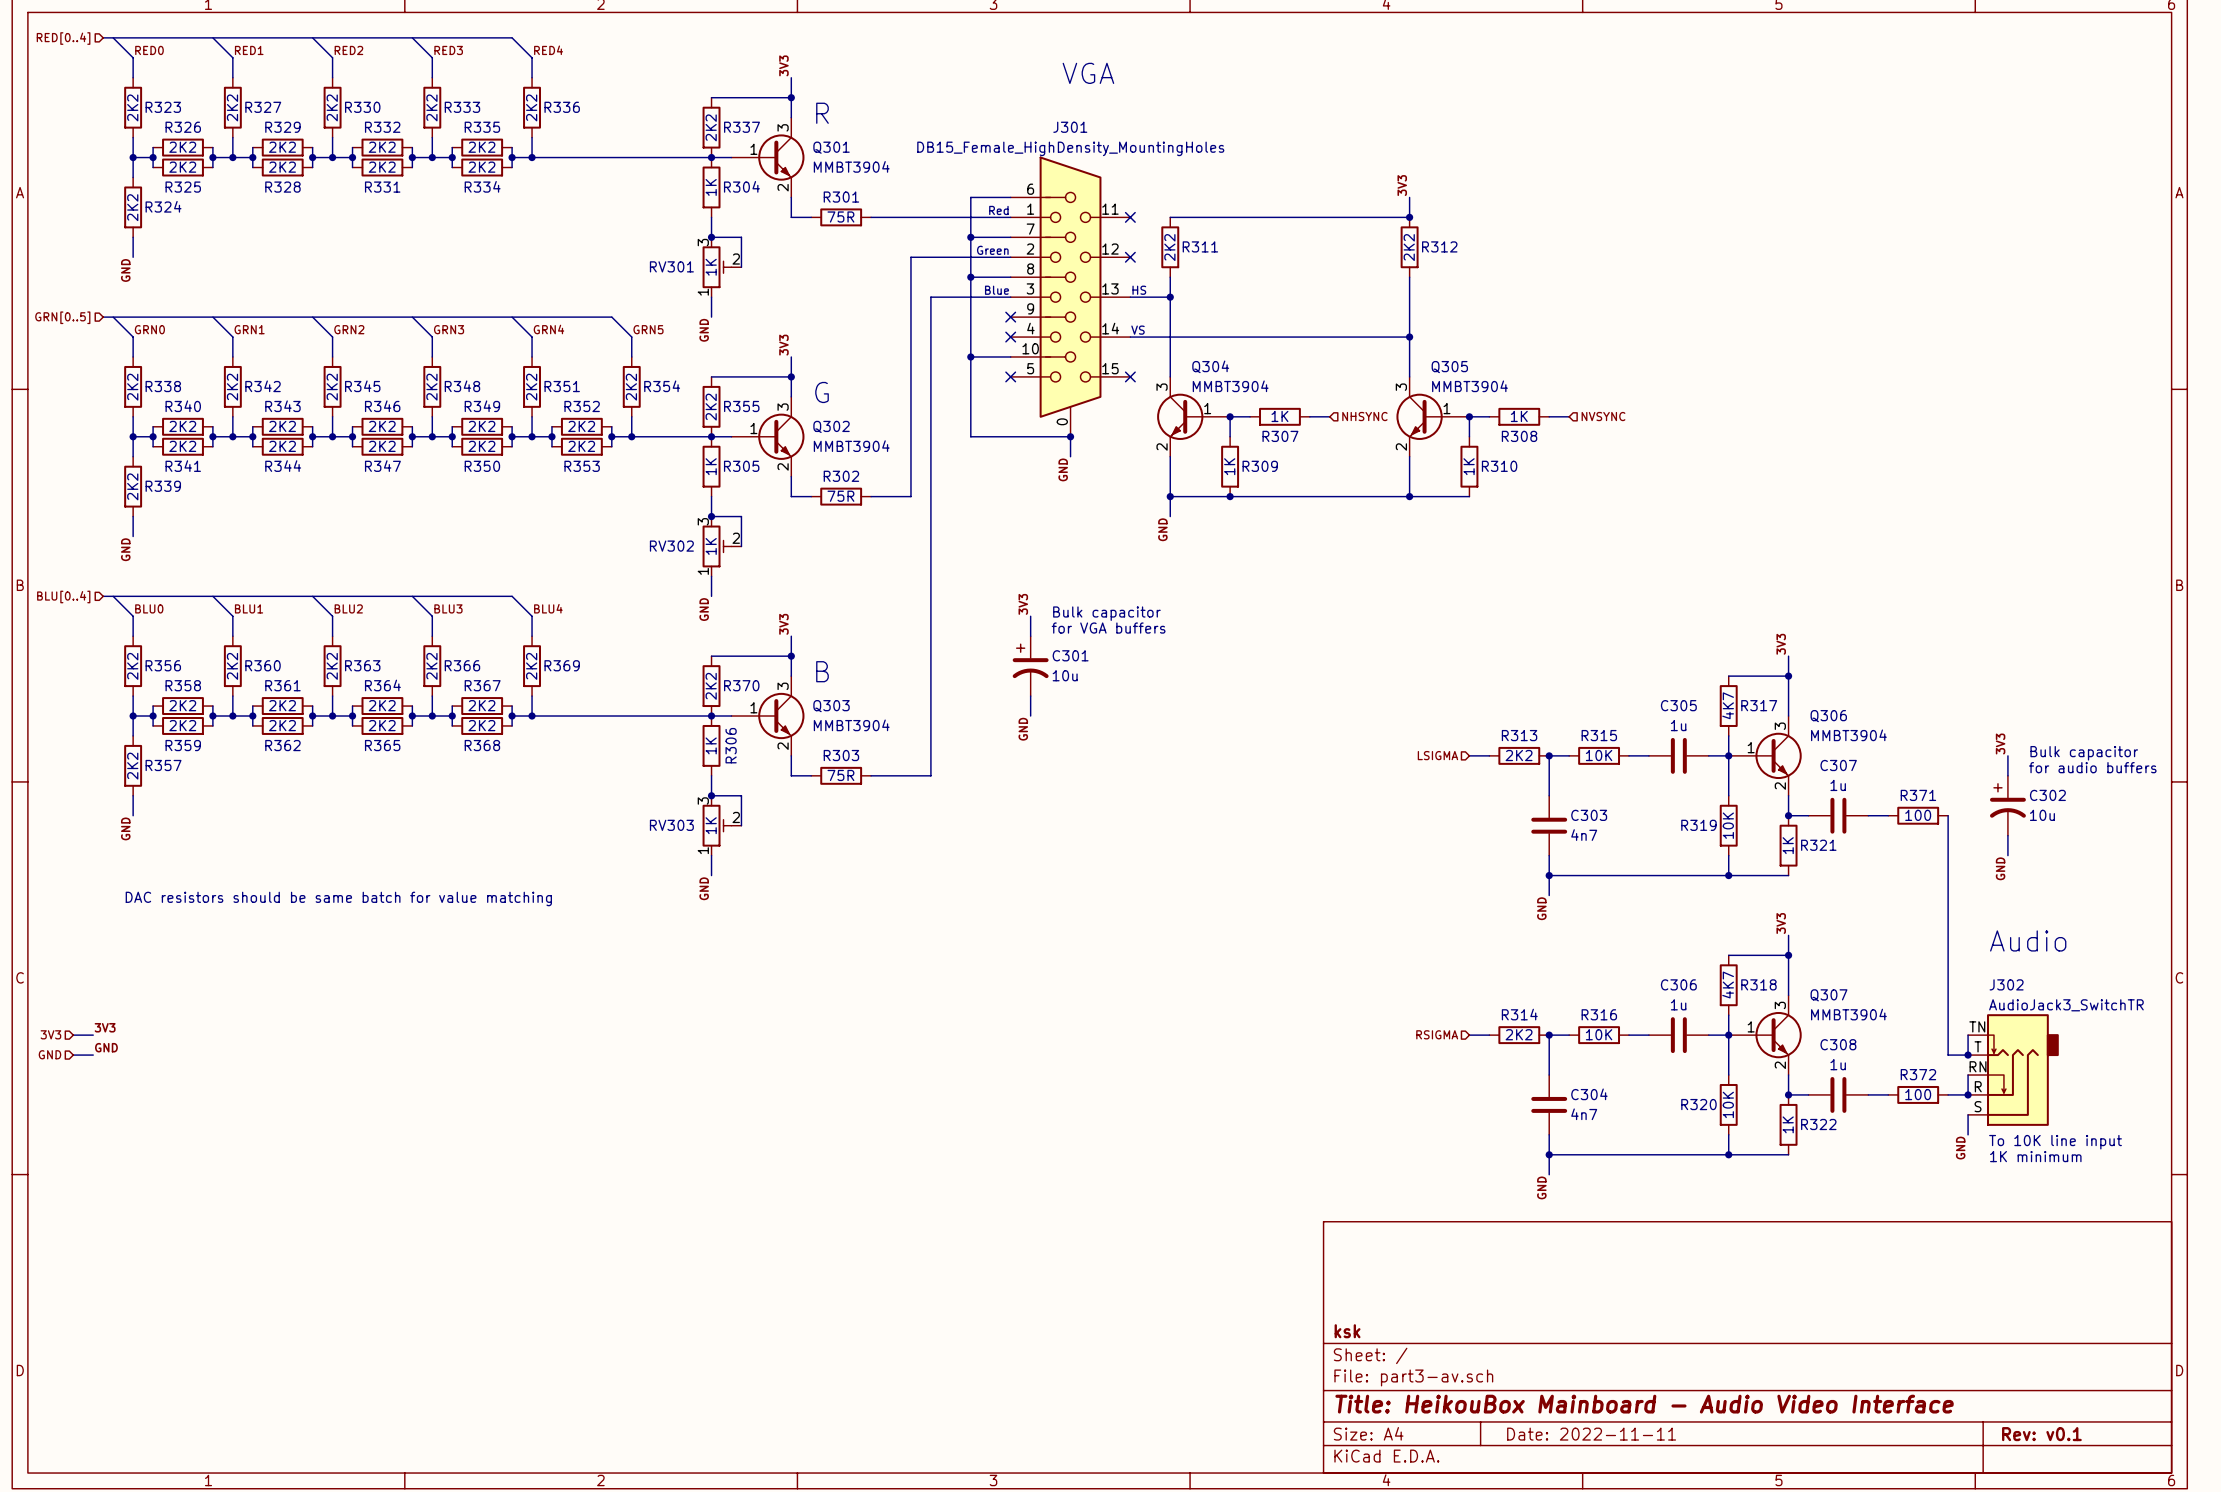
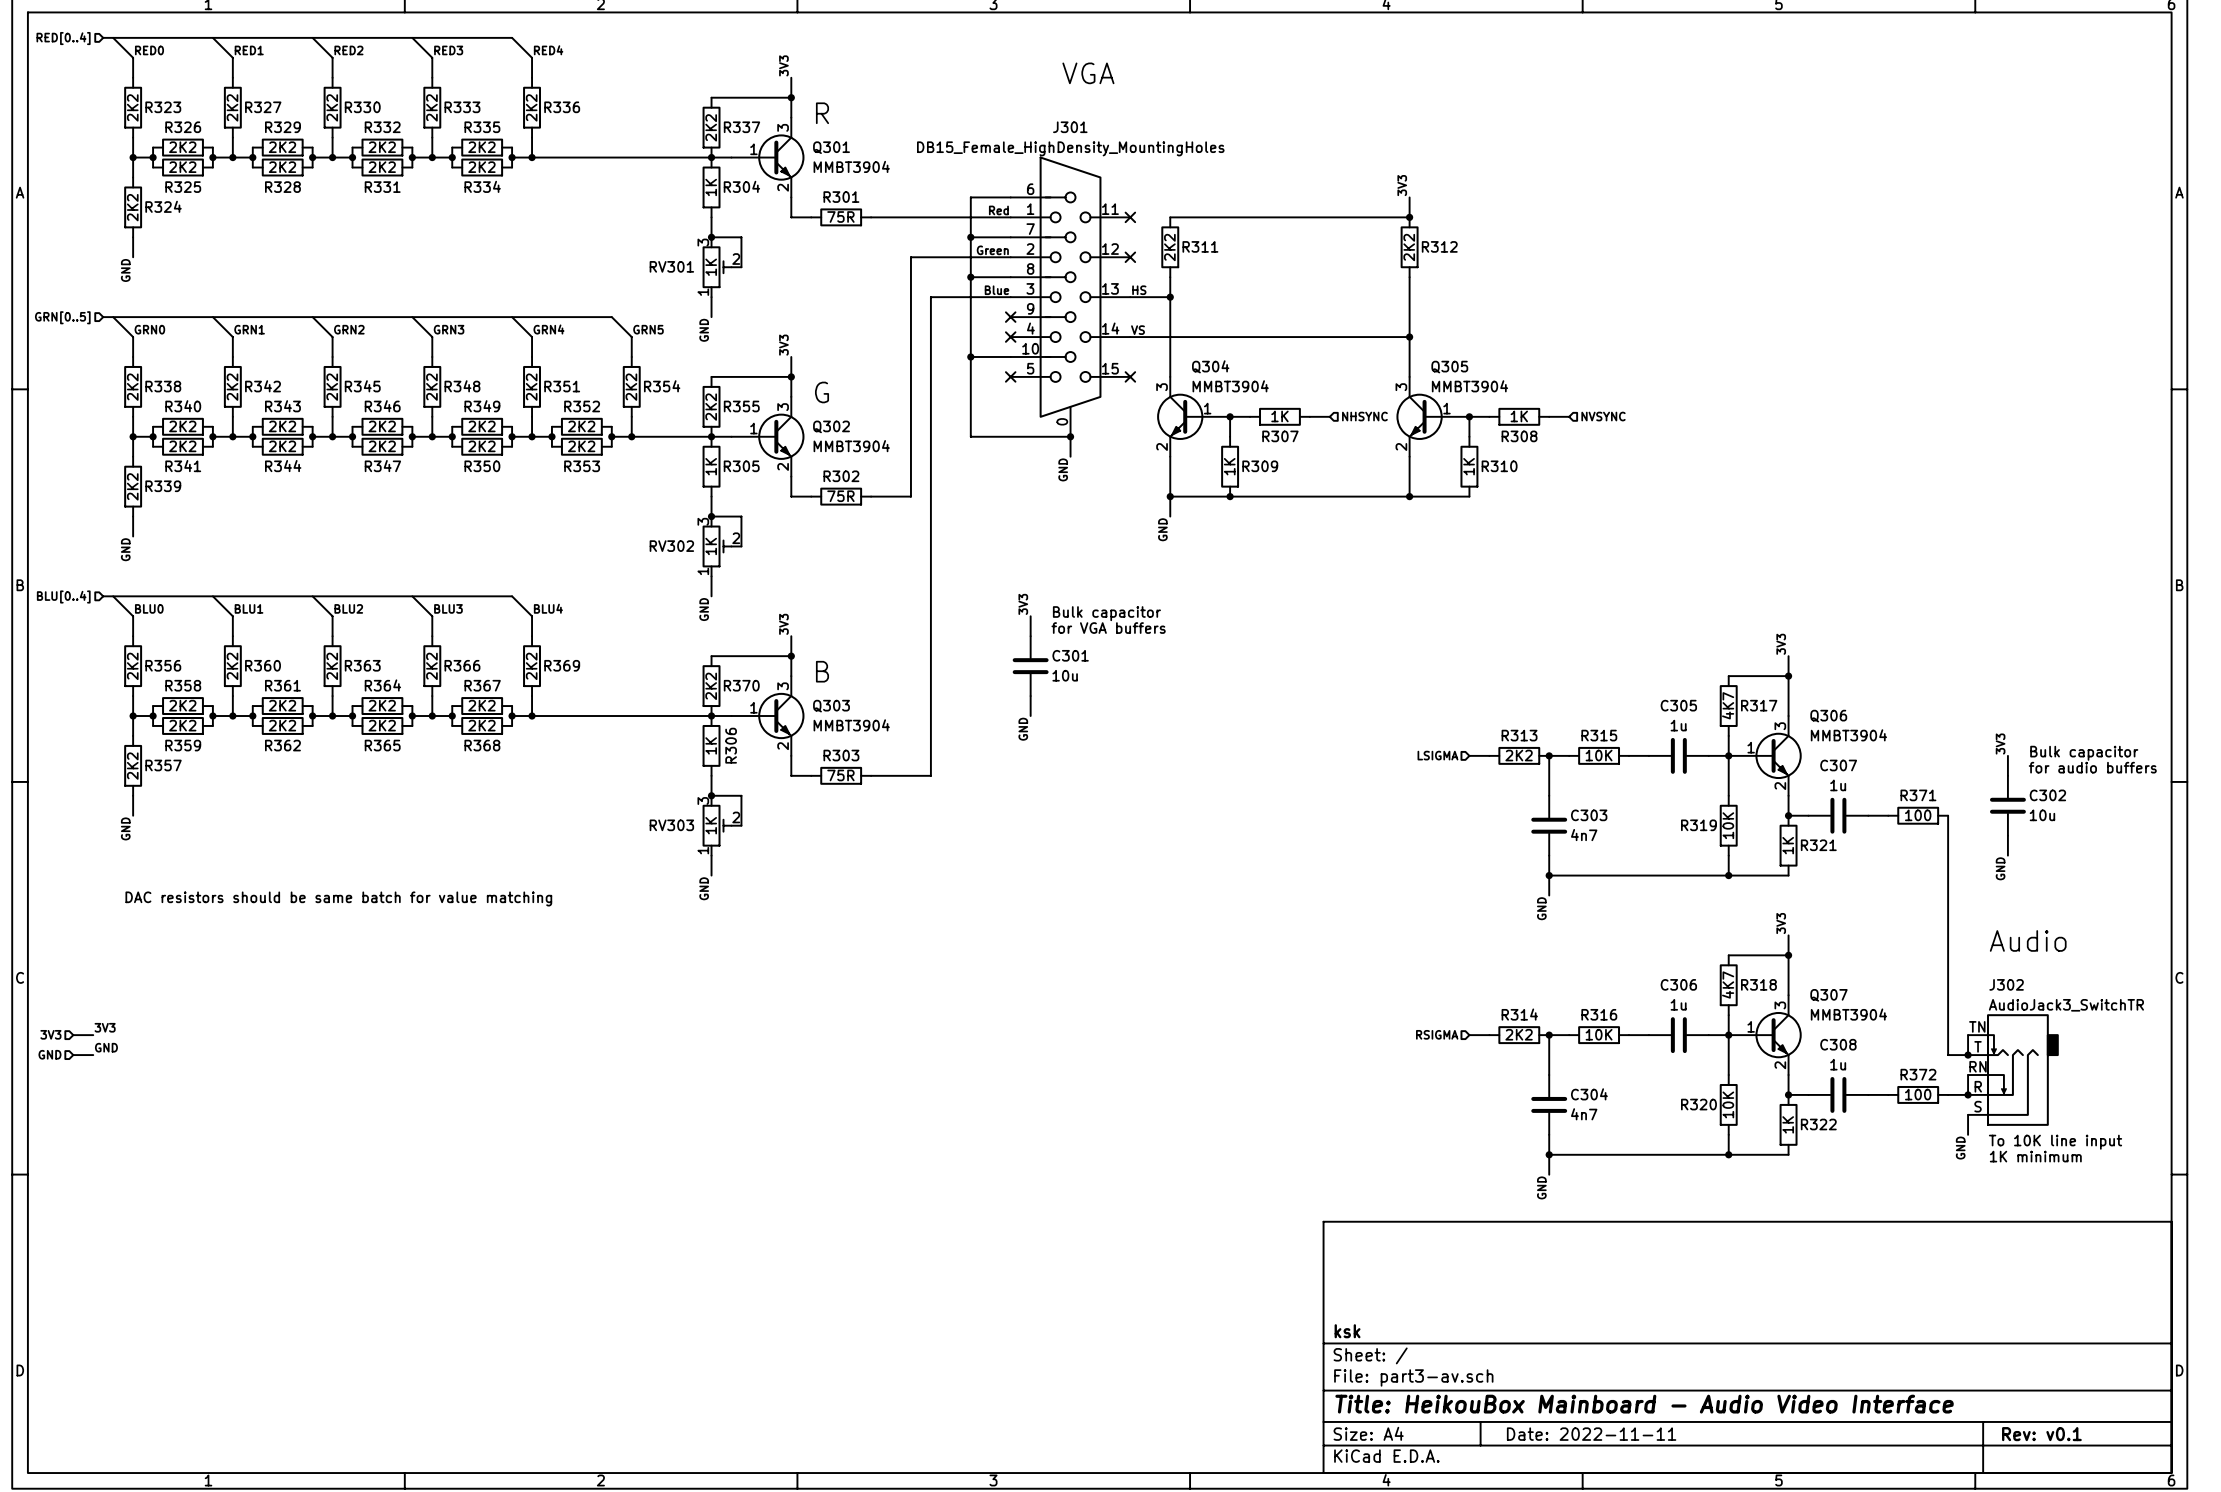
C301 symbol: [1012, 636, 1049, 697] -> [1012, 636, 1049, 697]
C302 symbol: [1989, 775, 2026, 836] -> [1989, 775, 2026, 836]

